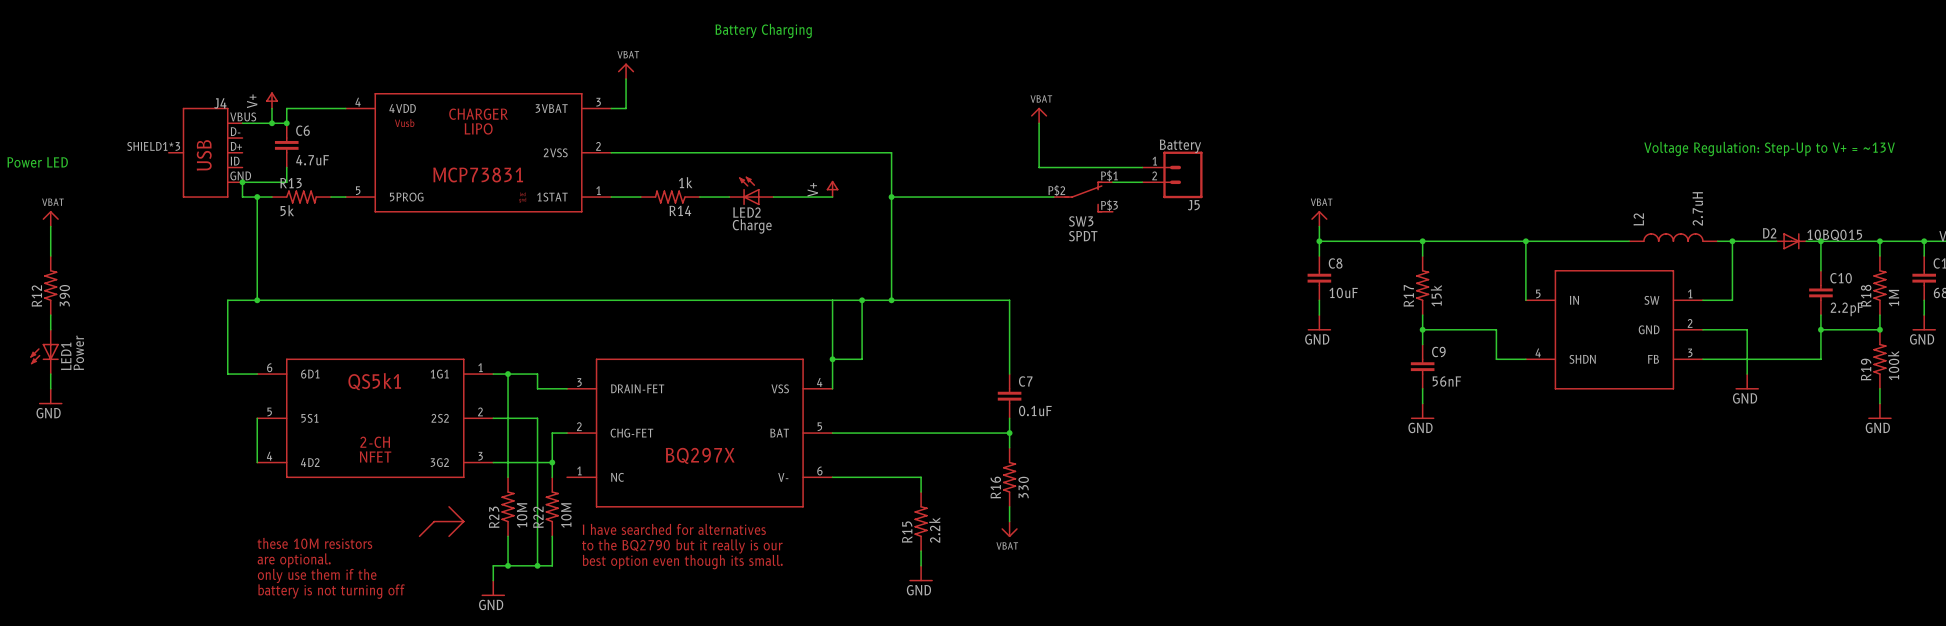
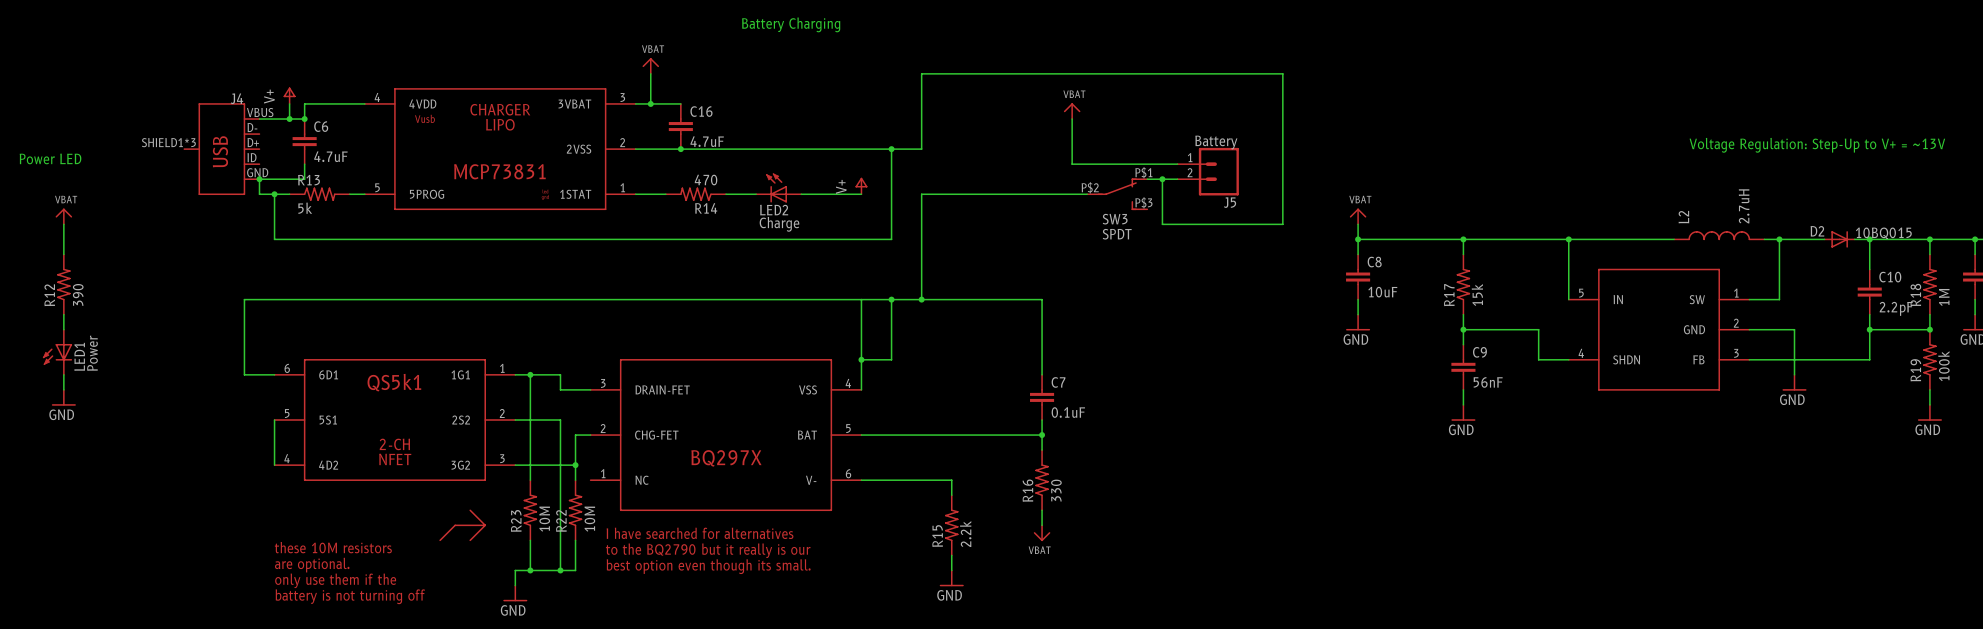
wire: none -> (650, 103) (680, 103)
junction: none -> (650, 103)
C16: none -> 4.7uF (680, 126)
junction: none -> (680, 149)
junction: none -> (891, 149)
wire: (891, 152) (891, 197) -> (921, 149) (921, 73) (1282, 73) (1282, 224) (1162, 224) (1162, 179)
R14 value: 1k (685, 182) -> 470 (706, 180)
junction: none -> (1162, 179)
junction: (891, 197) -> none
wire: (257, 241) (257, 300) -> (274, 239) (891, 239) (891, 149)
junction: (257, 300) -> none

